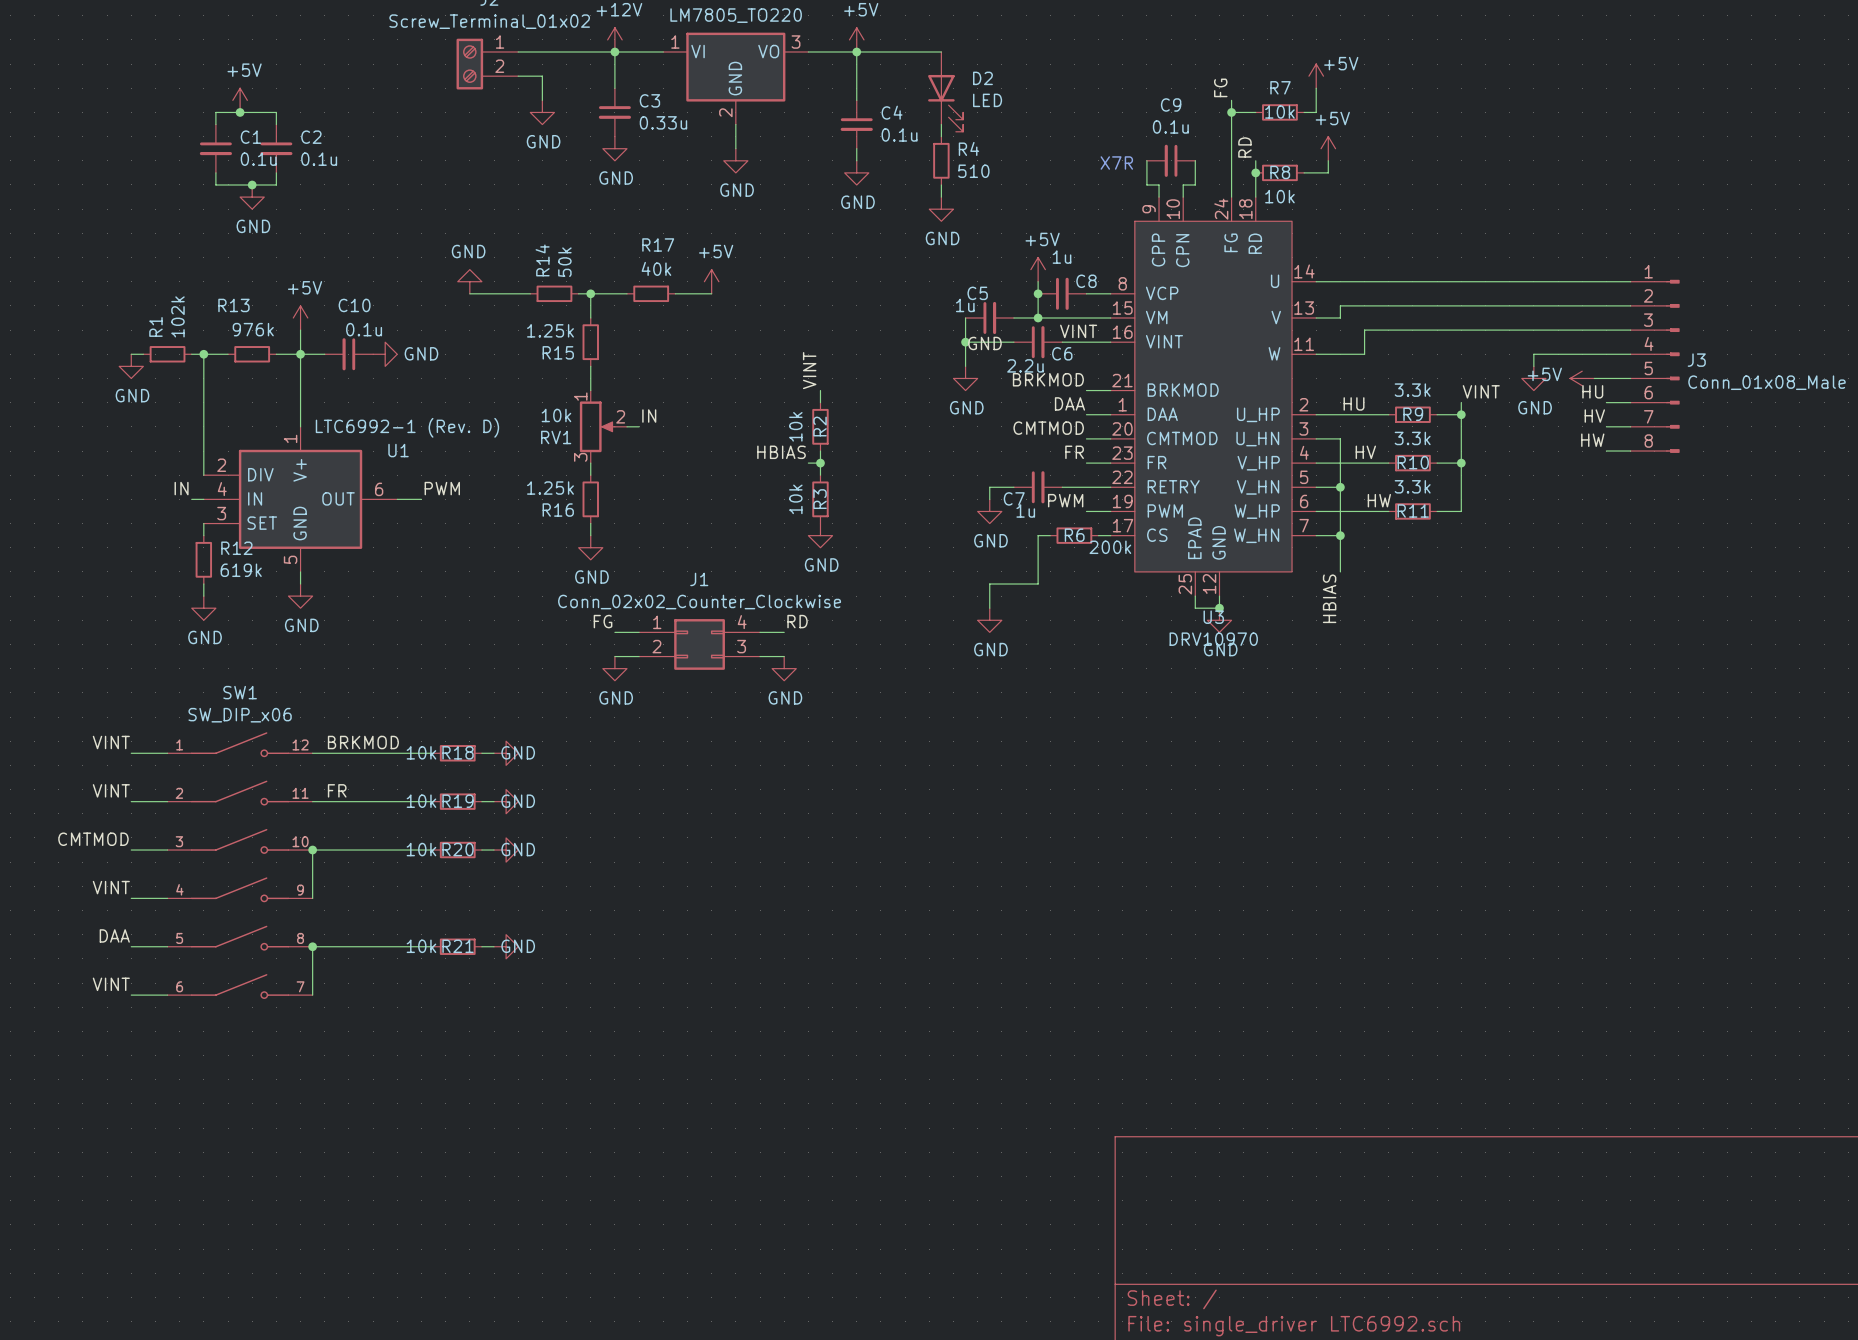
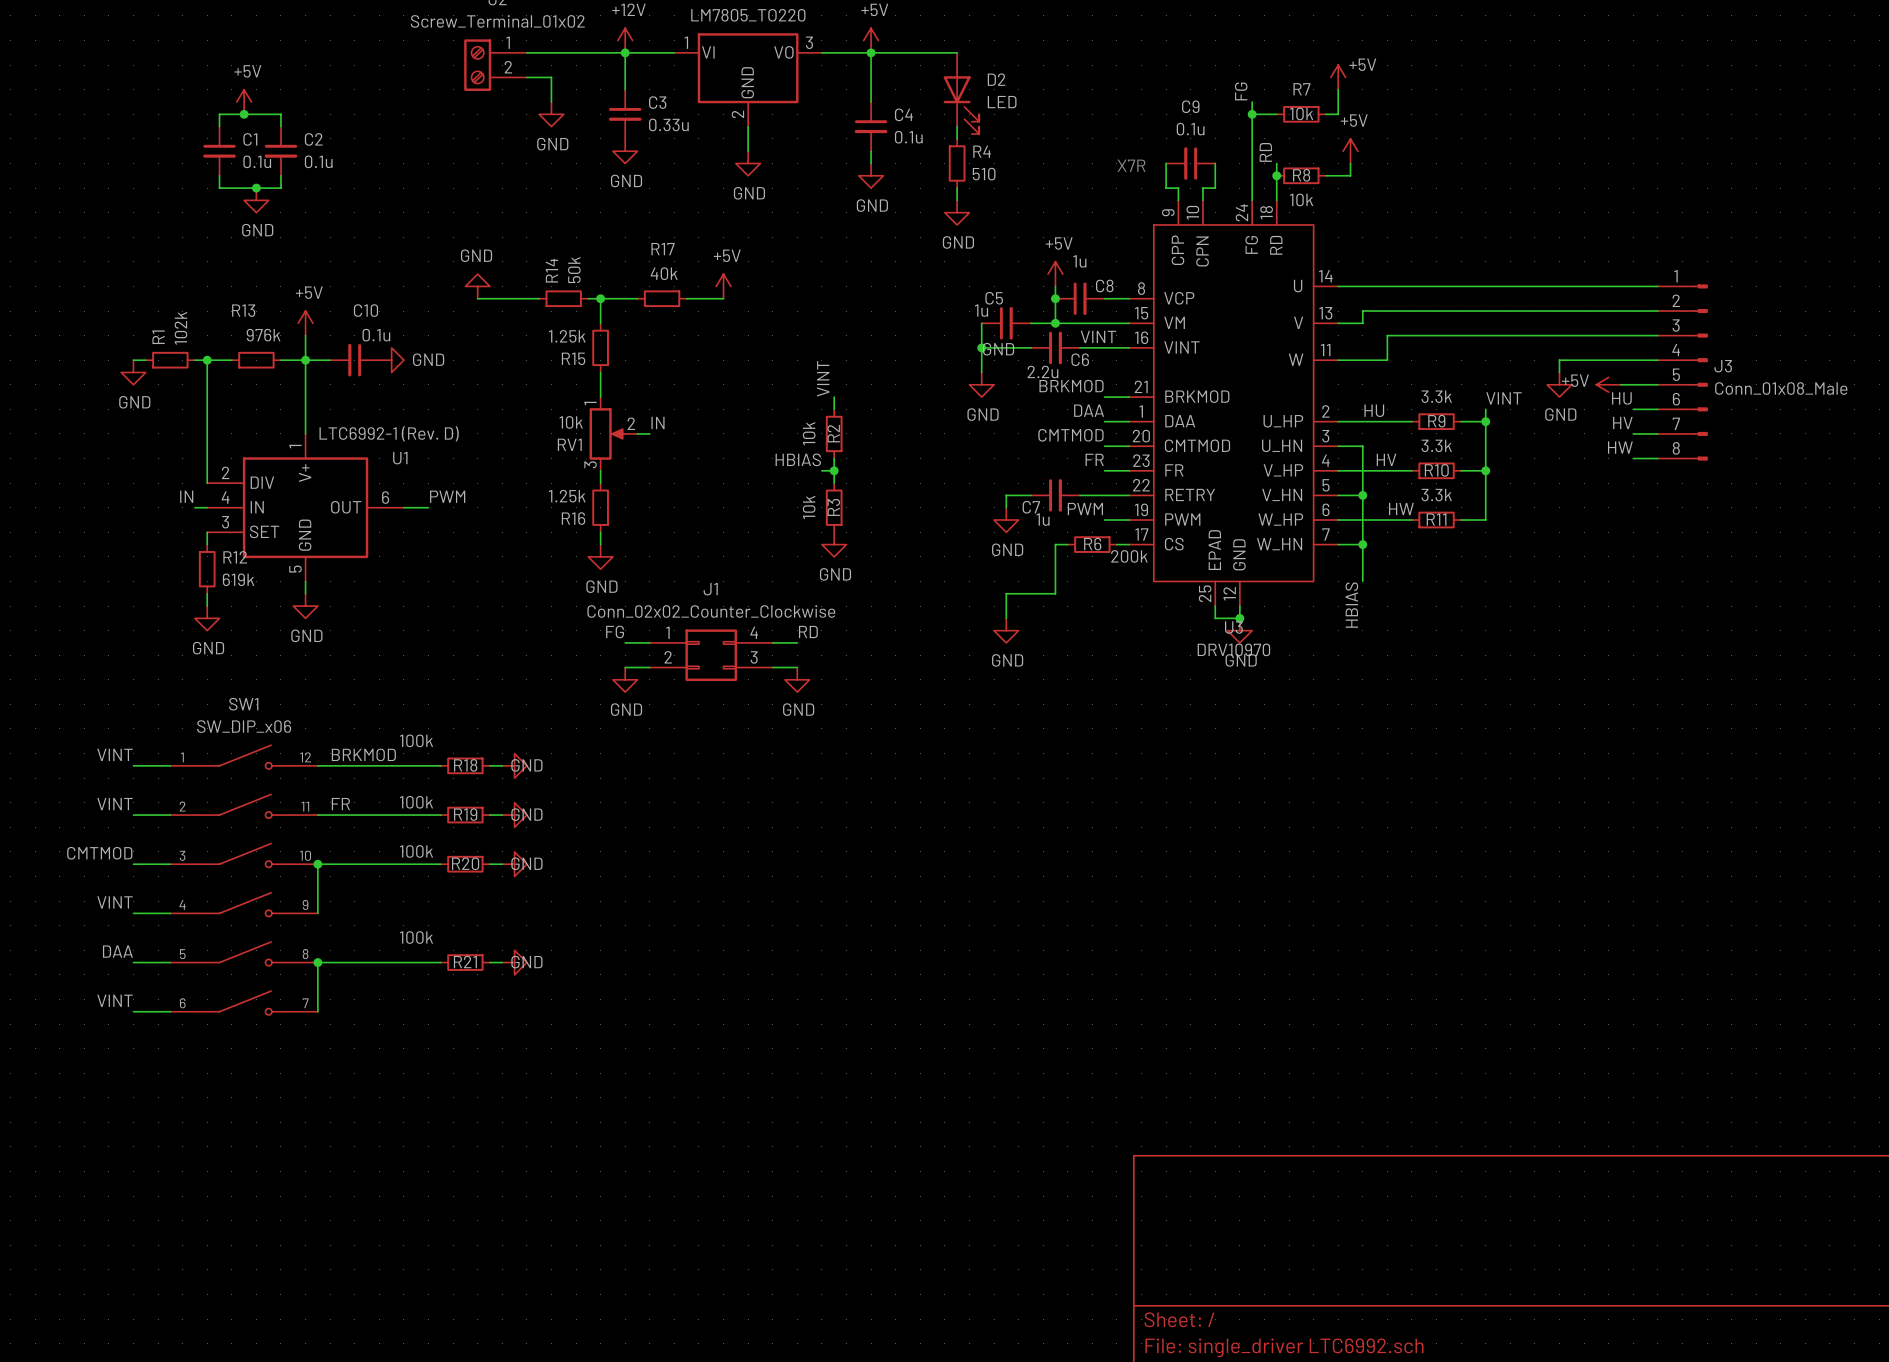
R18 value: 10k (421, 752) -> 100k (416, 740)
R19 value: 10k (421, 801) -> 100k (416, 802)
R20 value: 10k (421, 849) -> 100k (416, 851)
R21 value: 10k (421, 946) -> 100k (416, 937)

